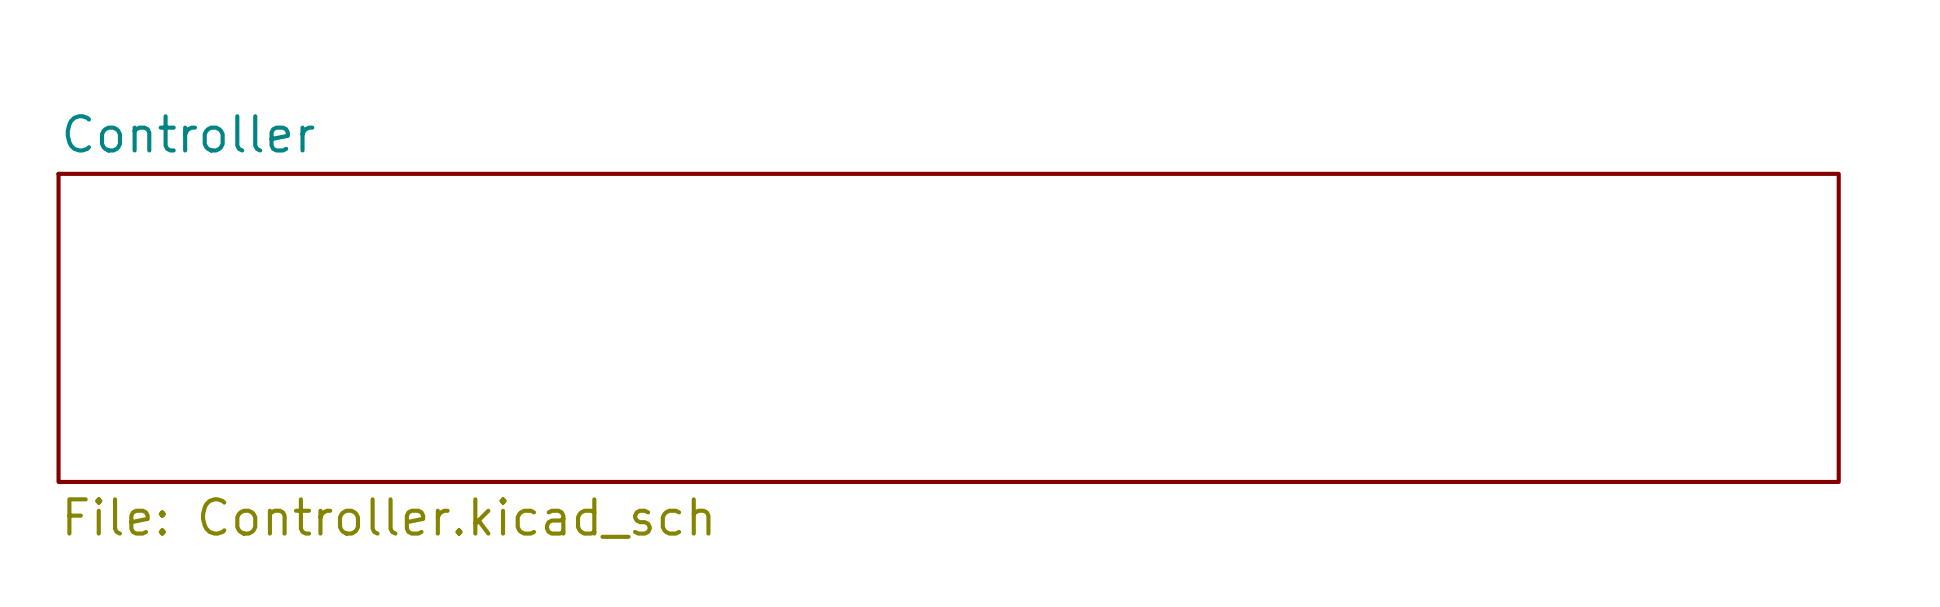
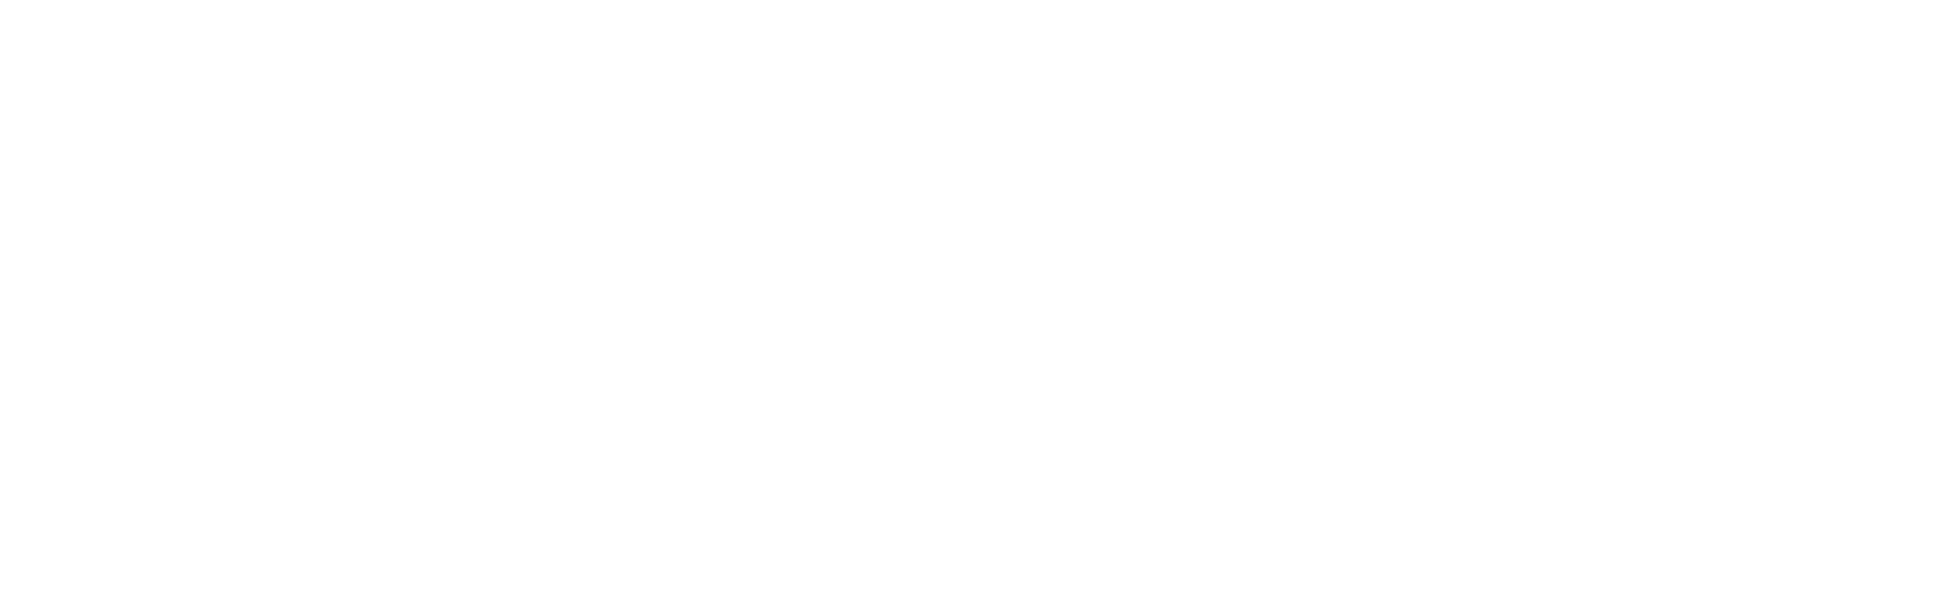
sheet Controller: File: Controller.kicad_sch (948, 327) -> none

